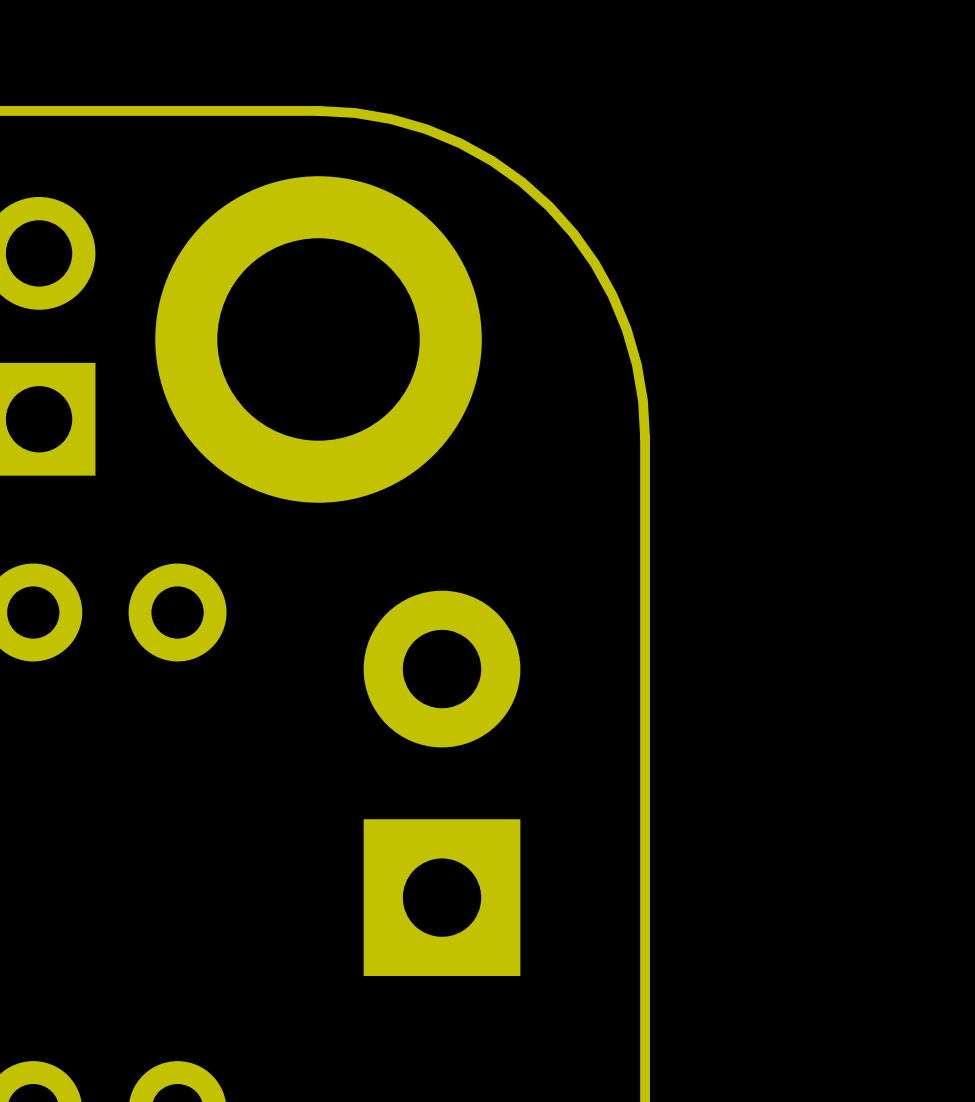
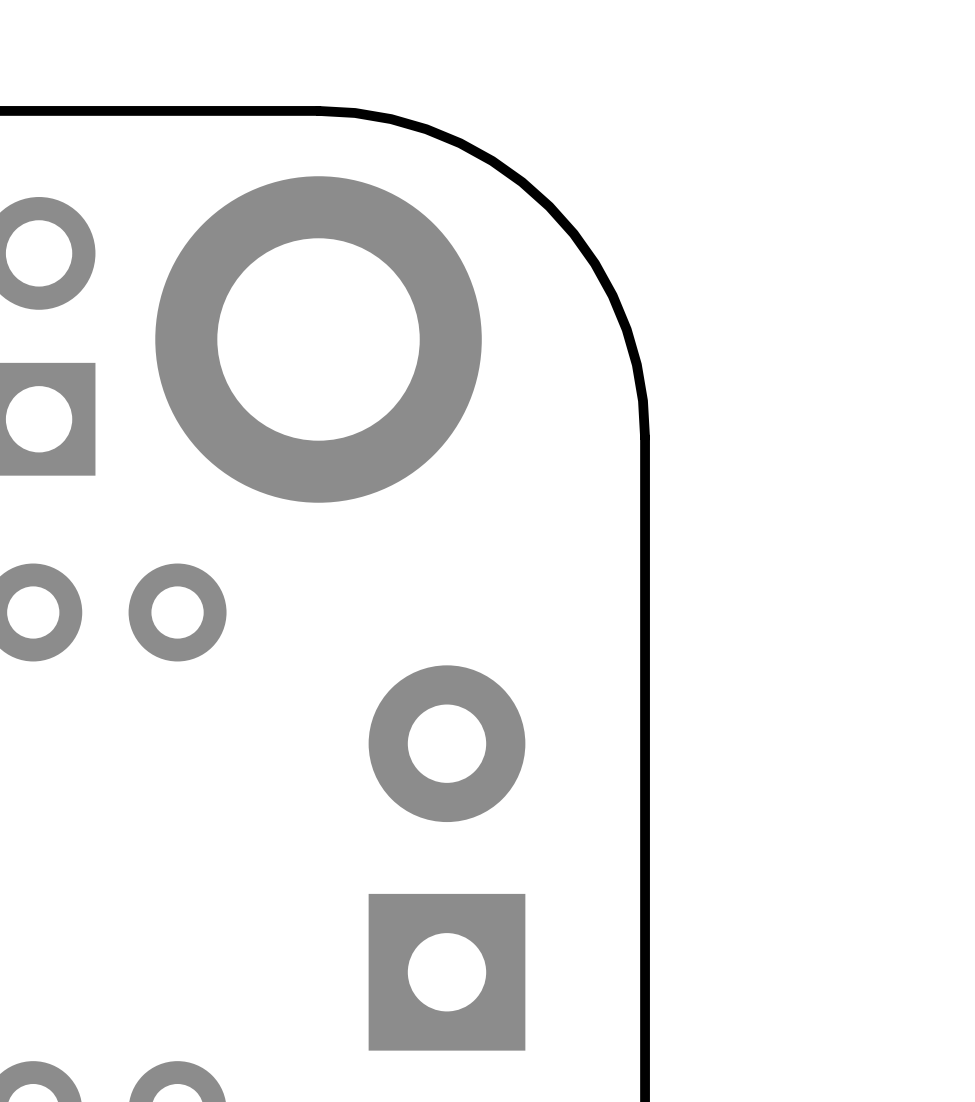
part position: (442, 783) -> (447, 857)

